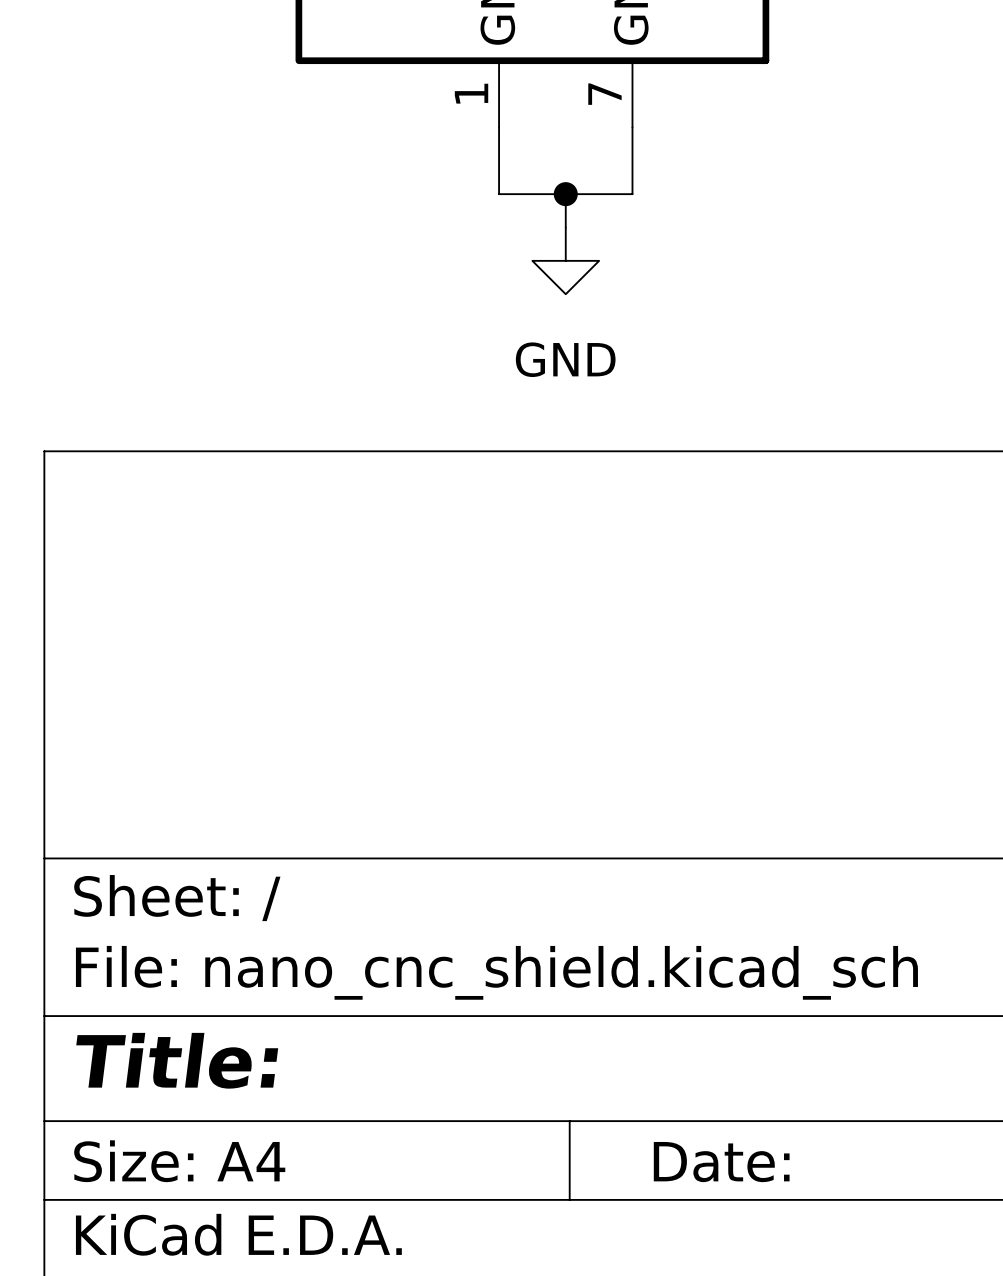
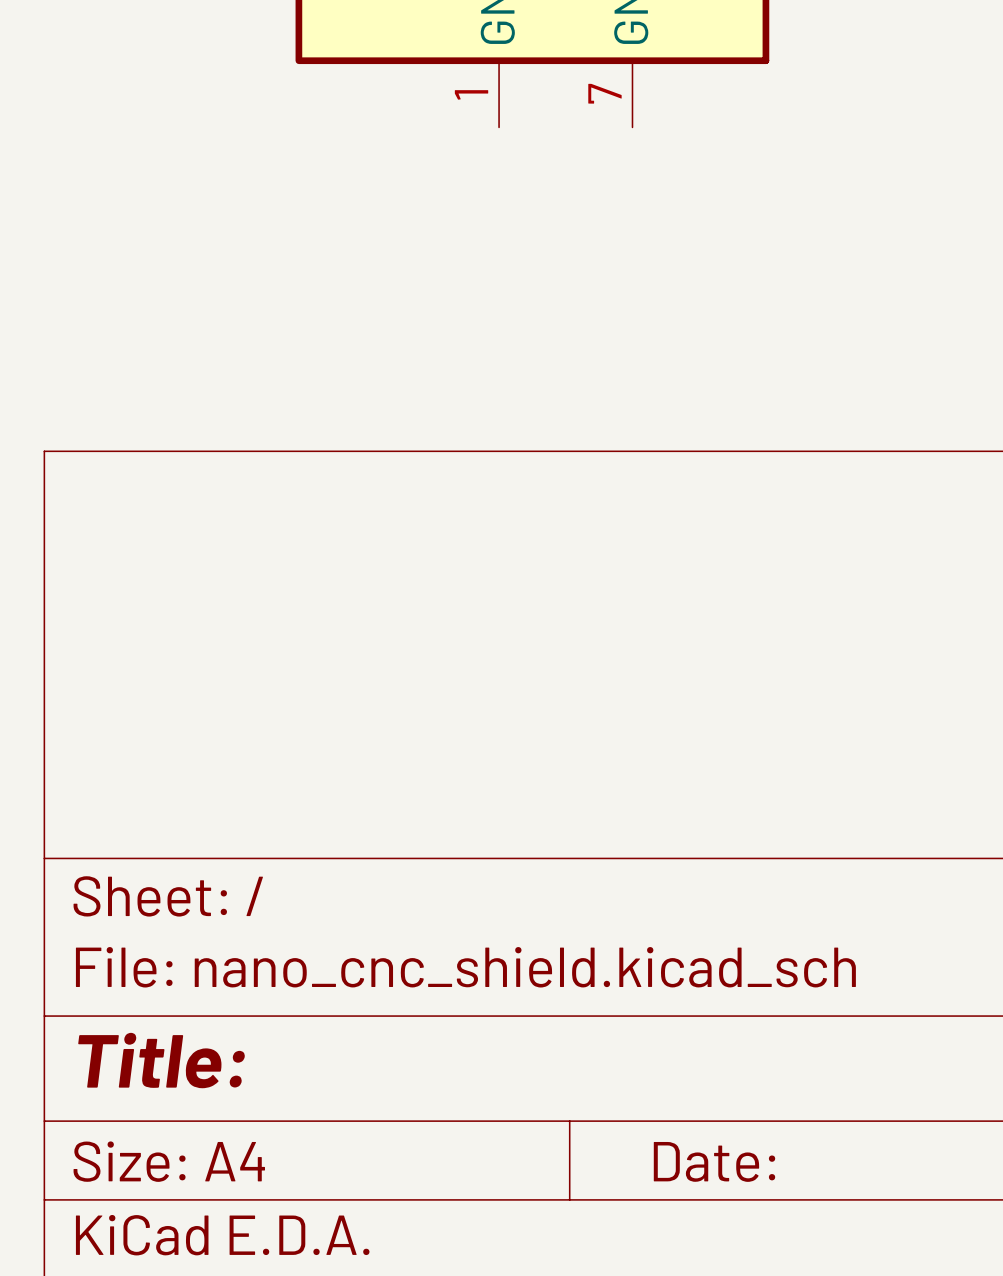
wire: (499, 127) (499, 194) (632, 194) (632, 127) -> none
wire: (565, 194) (565, 227) -> none
junction: (565, 194) -> none
power symbol: GND (565, 260) -> none

